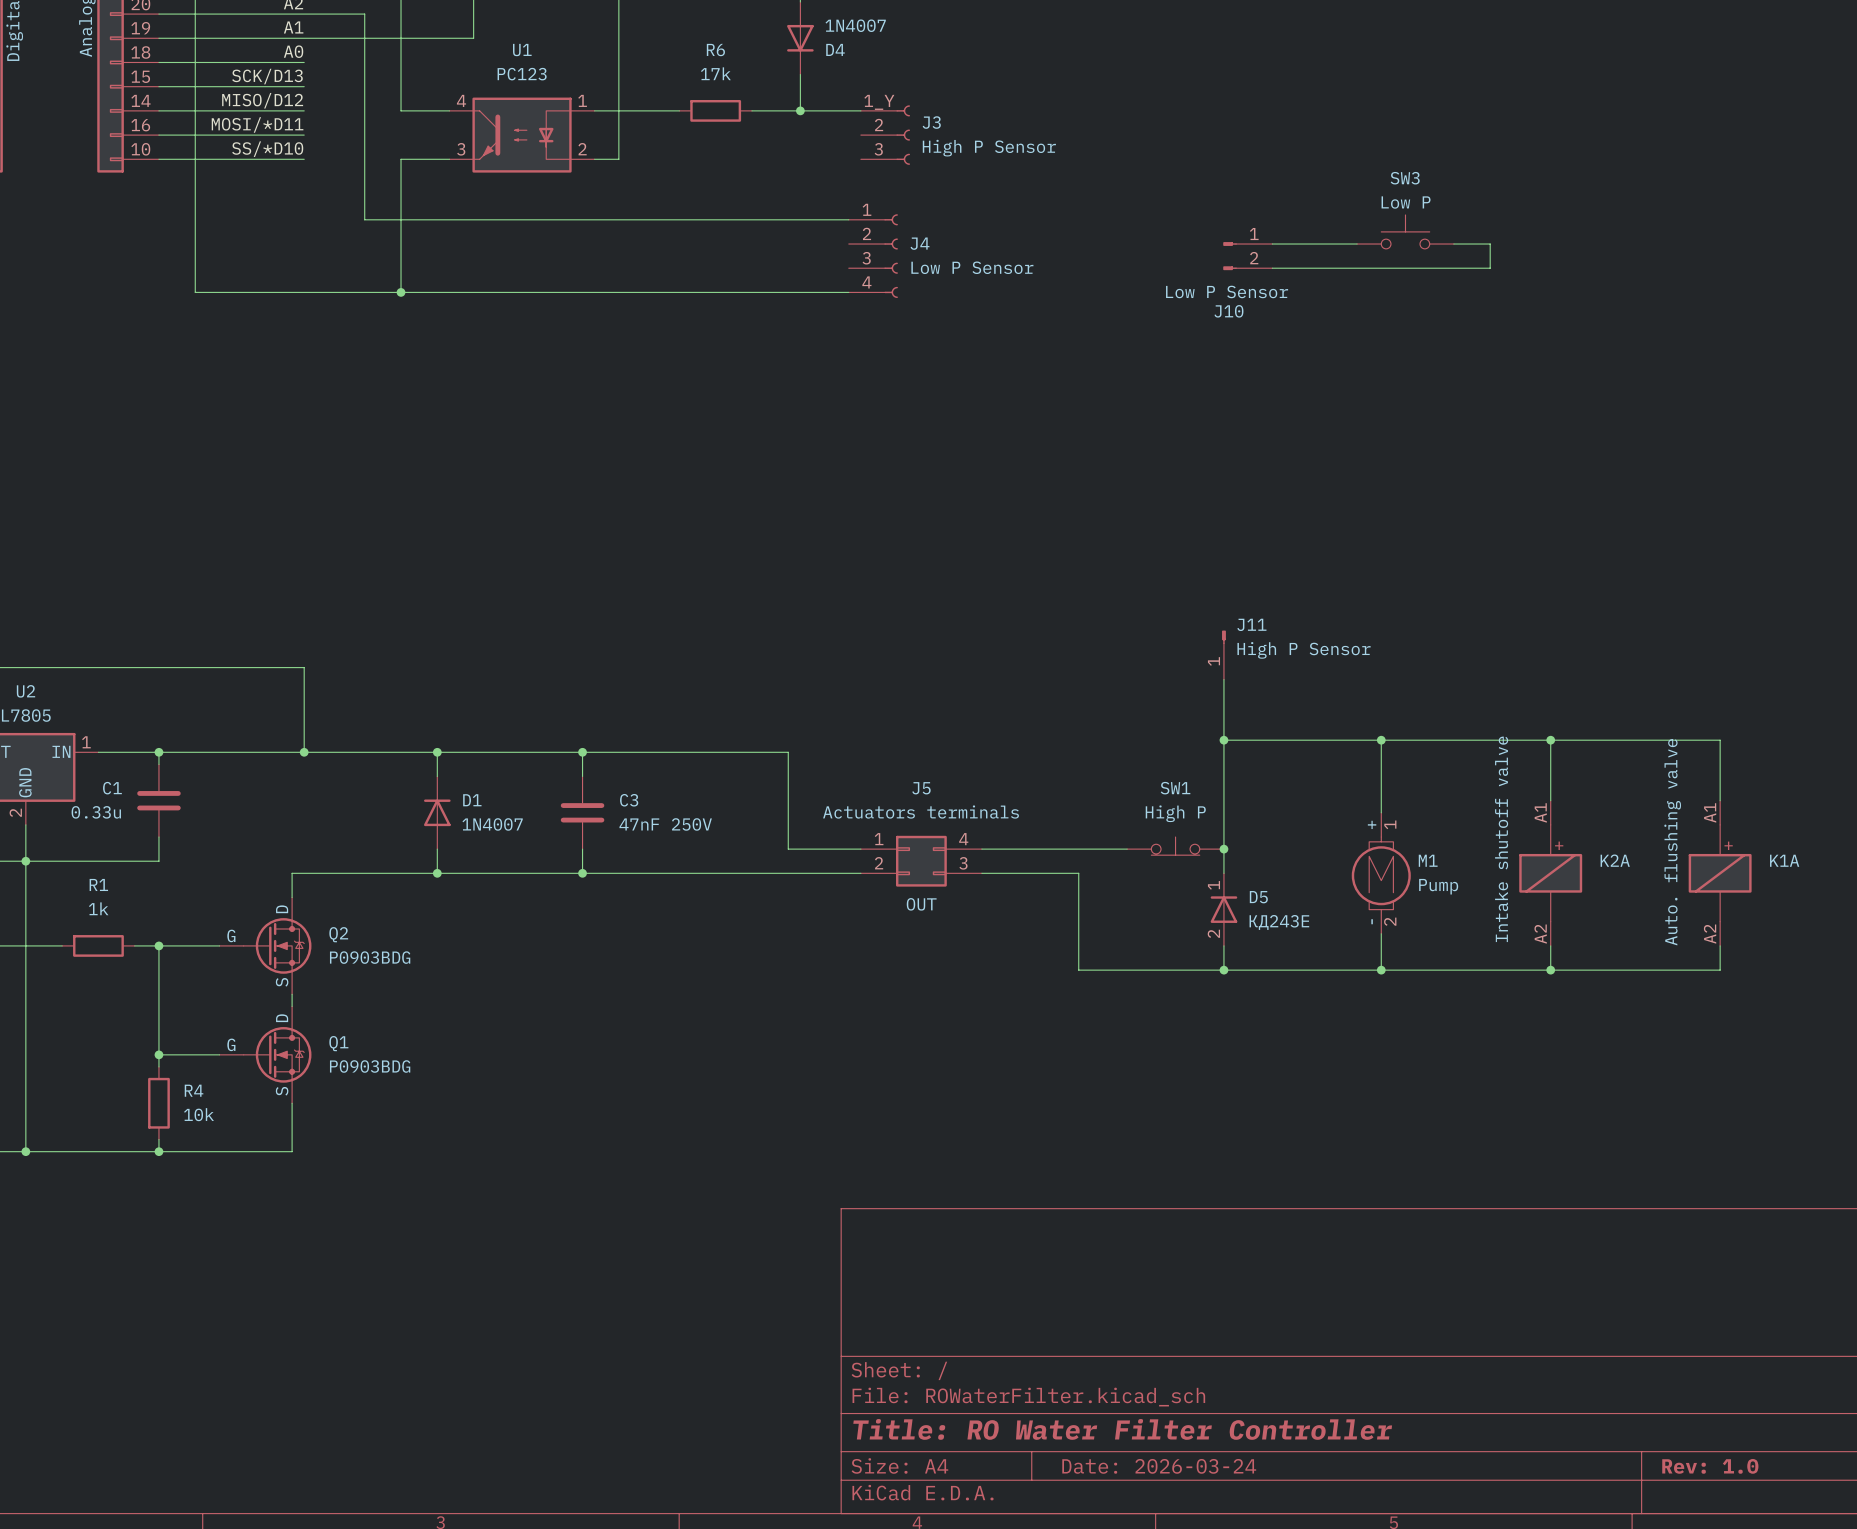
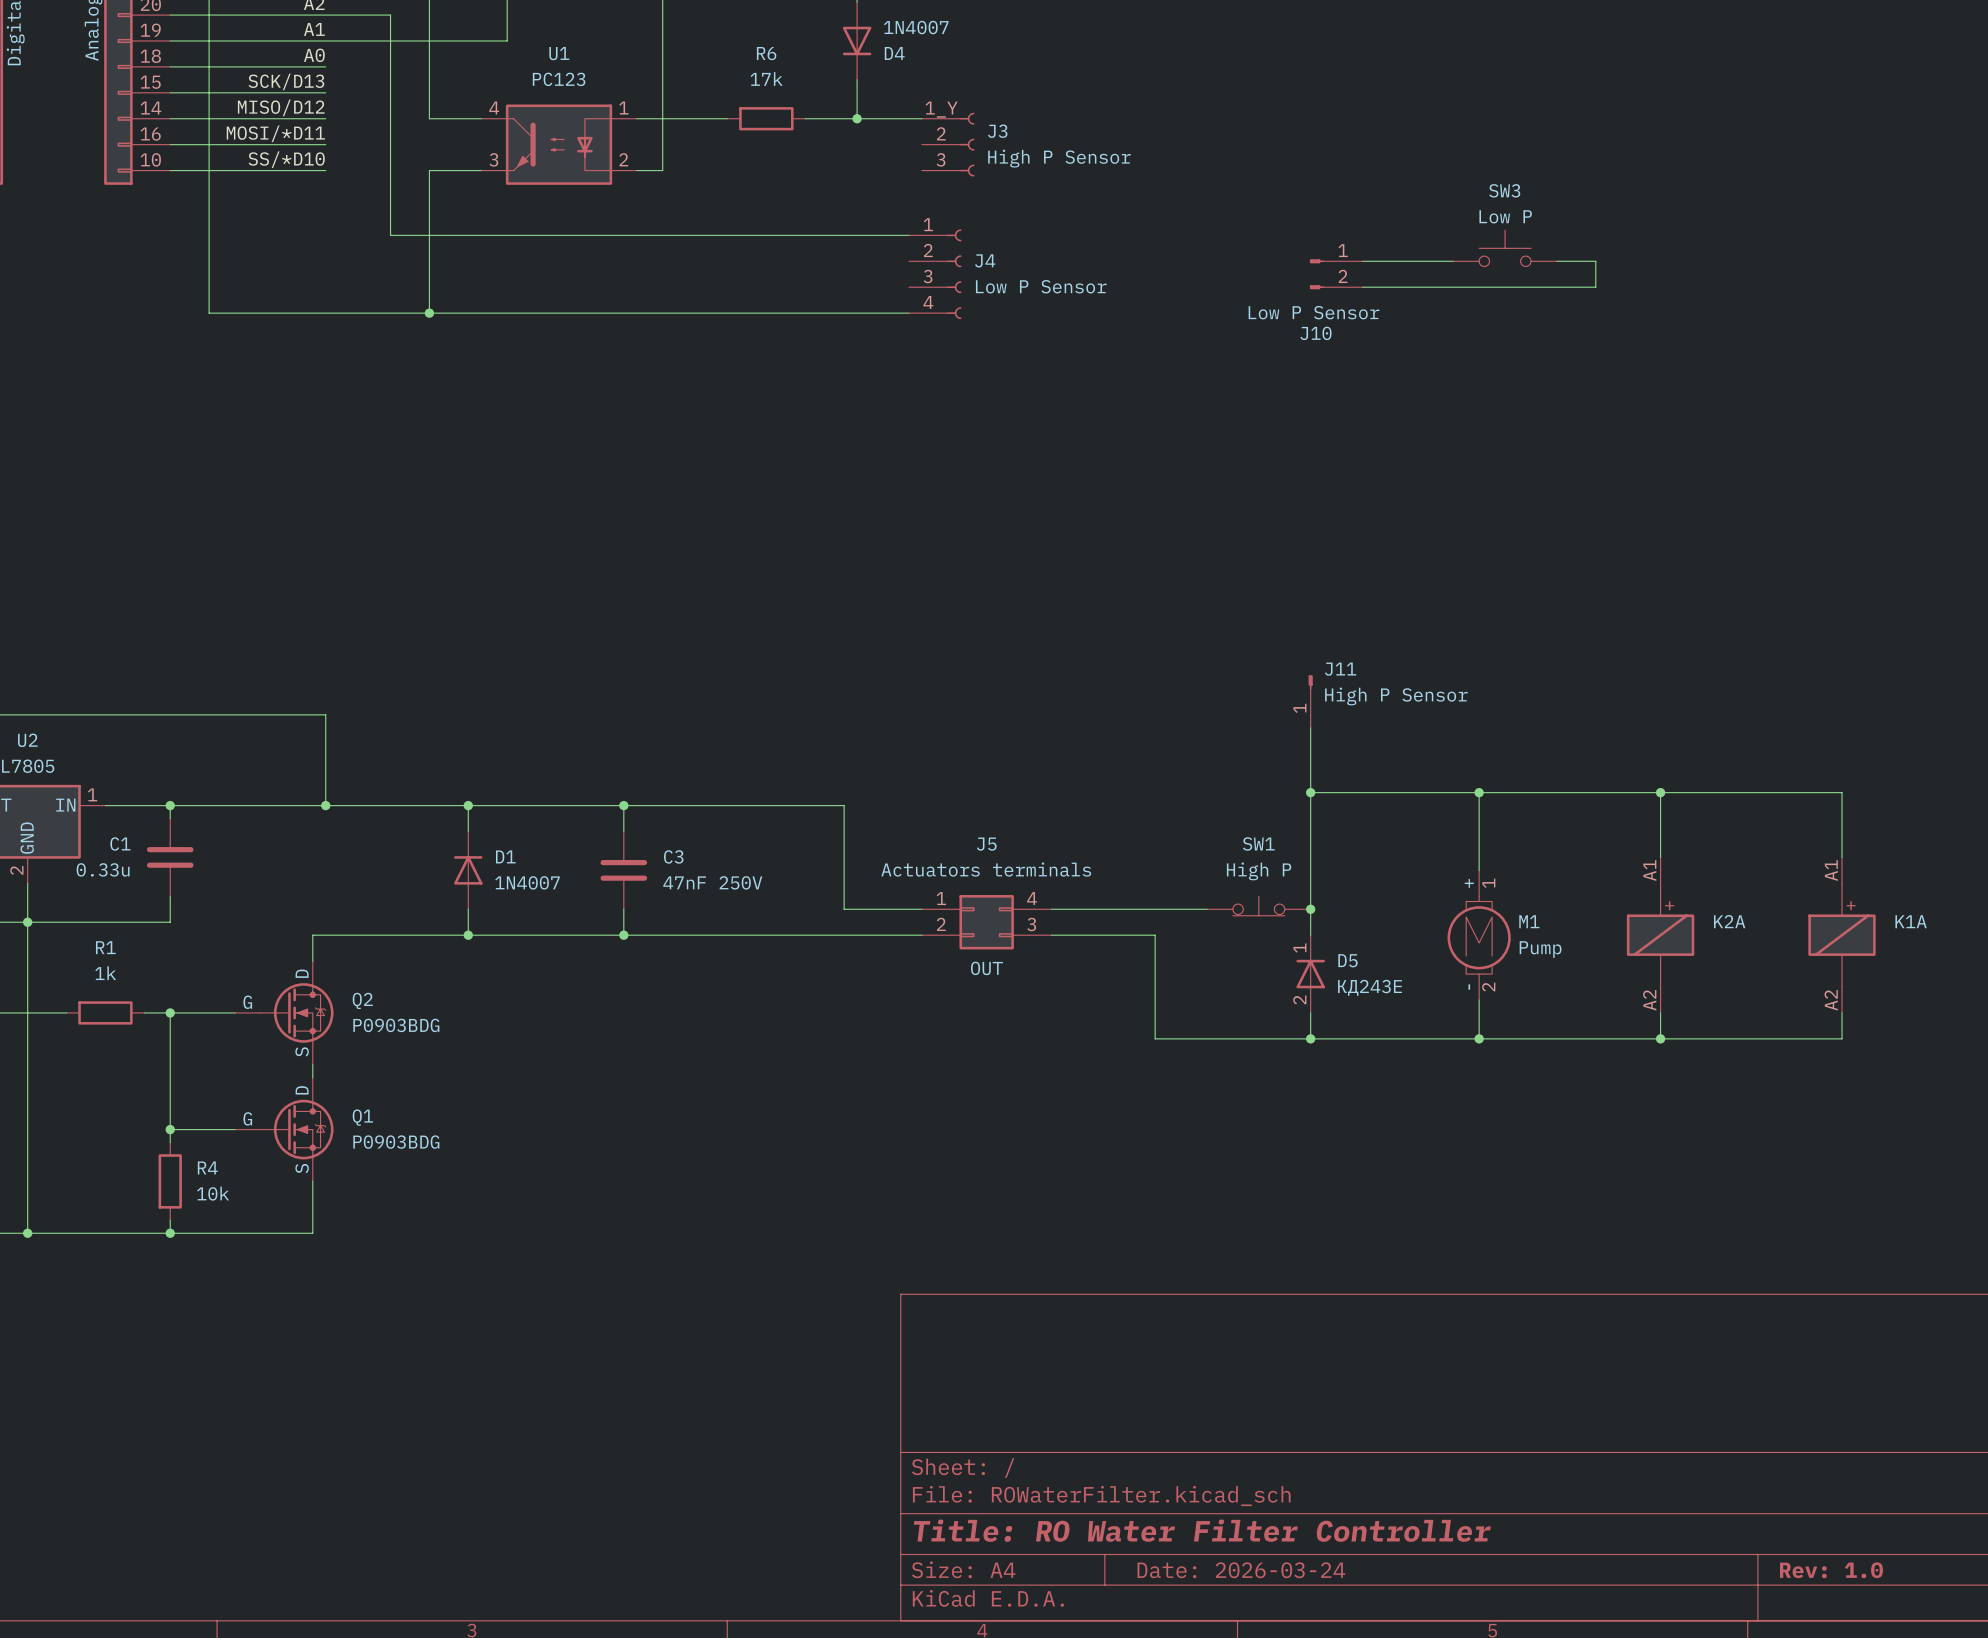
K2A value: Intake shutoff valve (1501, 839) -> none
K1A value: Auto. flushing valve (1672, 842) -> none

